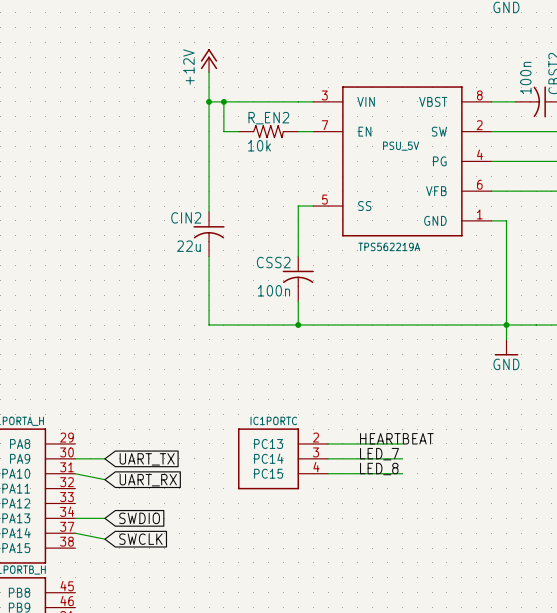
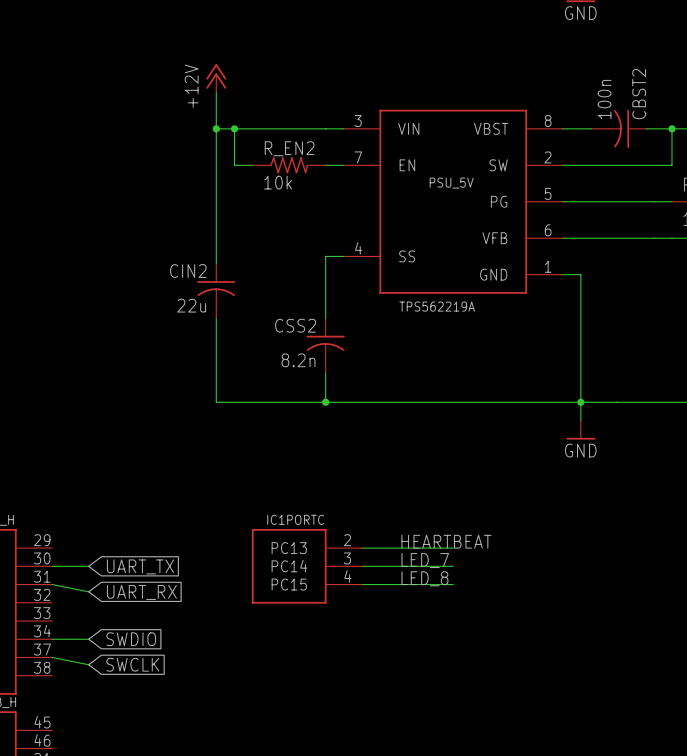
PSU_5V pin number: 4 (479, 154) -> 5 (548, 193)
PSU_5V pin number: 5 (324, 199) -> 4 (358, 248)
CSS2 value: 100n (273, 290) -> 8.2n (298, 360)

